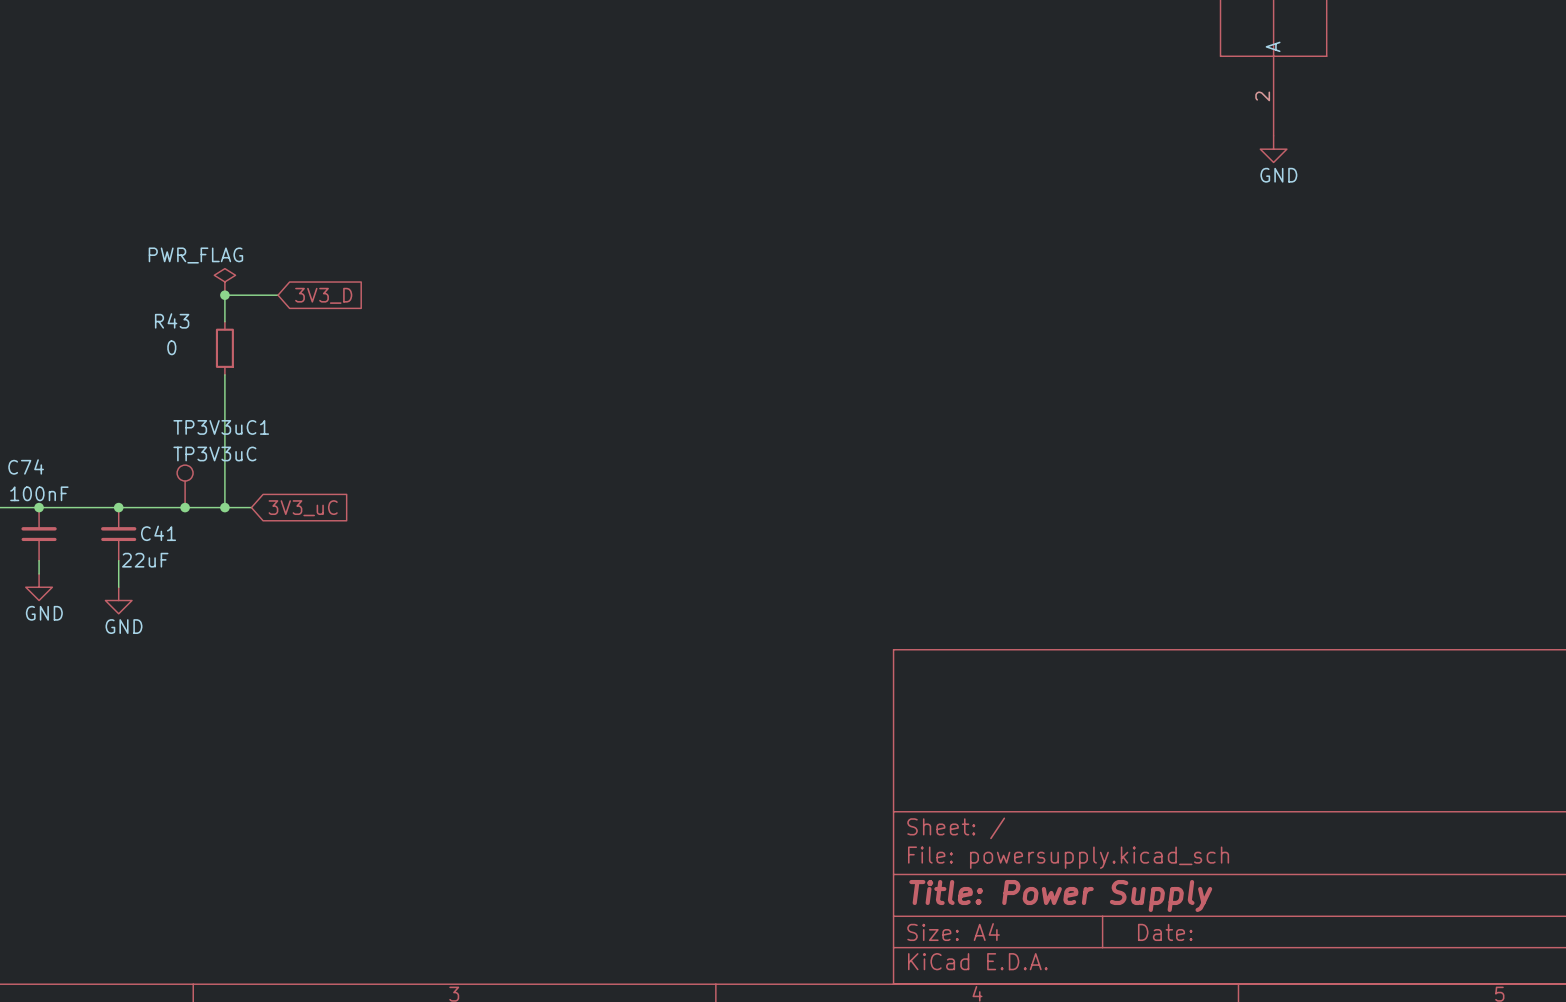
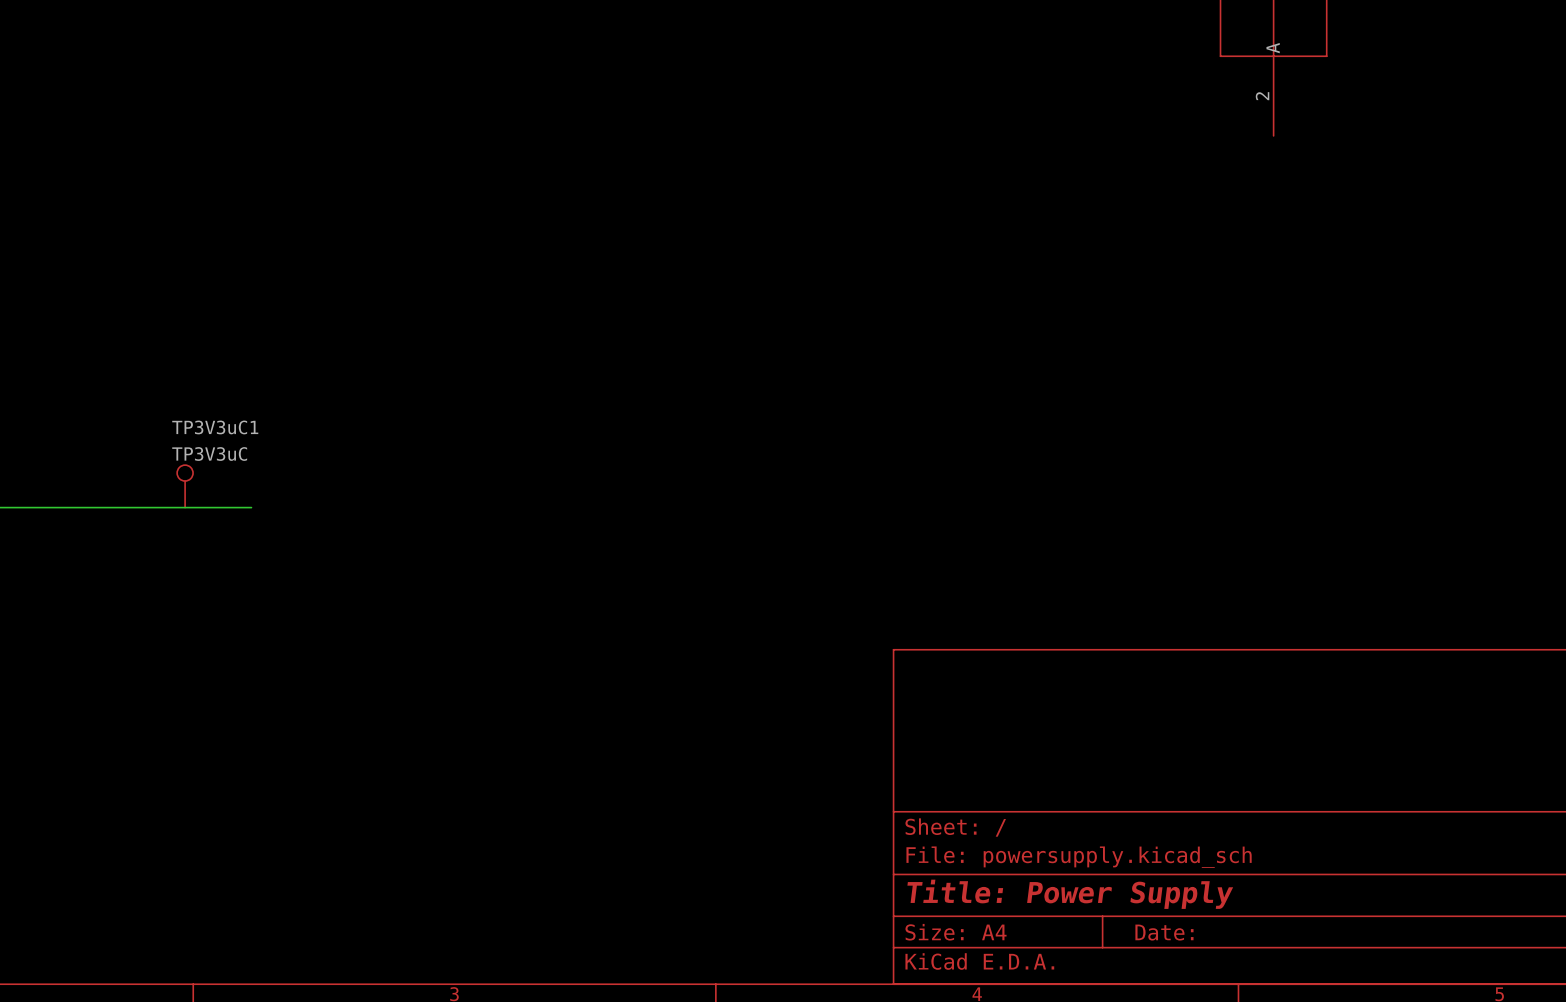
power symbol: GND (1273, 149) -> none
power symbol: PWR_FLAG (224, 281) -> none
junction: (224, 295) -> none
wire: (278, 295) (224, 295) (224, 321) -> none
global label: 3V3_D (323, 295) -> none
R43: 0 (224, 348) -> none
wire: (224, 374) (224, 507) -> none
junction: (39, 507) -> none
junction: (118, 507) -> none
junction: (185, 507) -> none
junction: (224, 507) -> none
global label: 3V3_uC (303, 508) -> none
C74: 100nF (39, 534) -> none
C41: 22uF (118, 534) -> none
wire: (39, 560) (39, 573) -> none
wire: (118, 560) (118, 587) -> none
power symbol: GND (39, 587) -> none
power symbol: GND (118, 600) -> none

